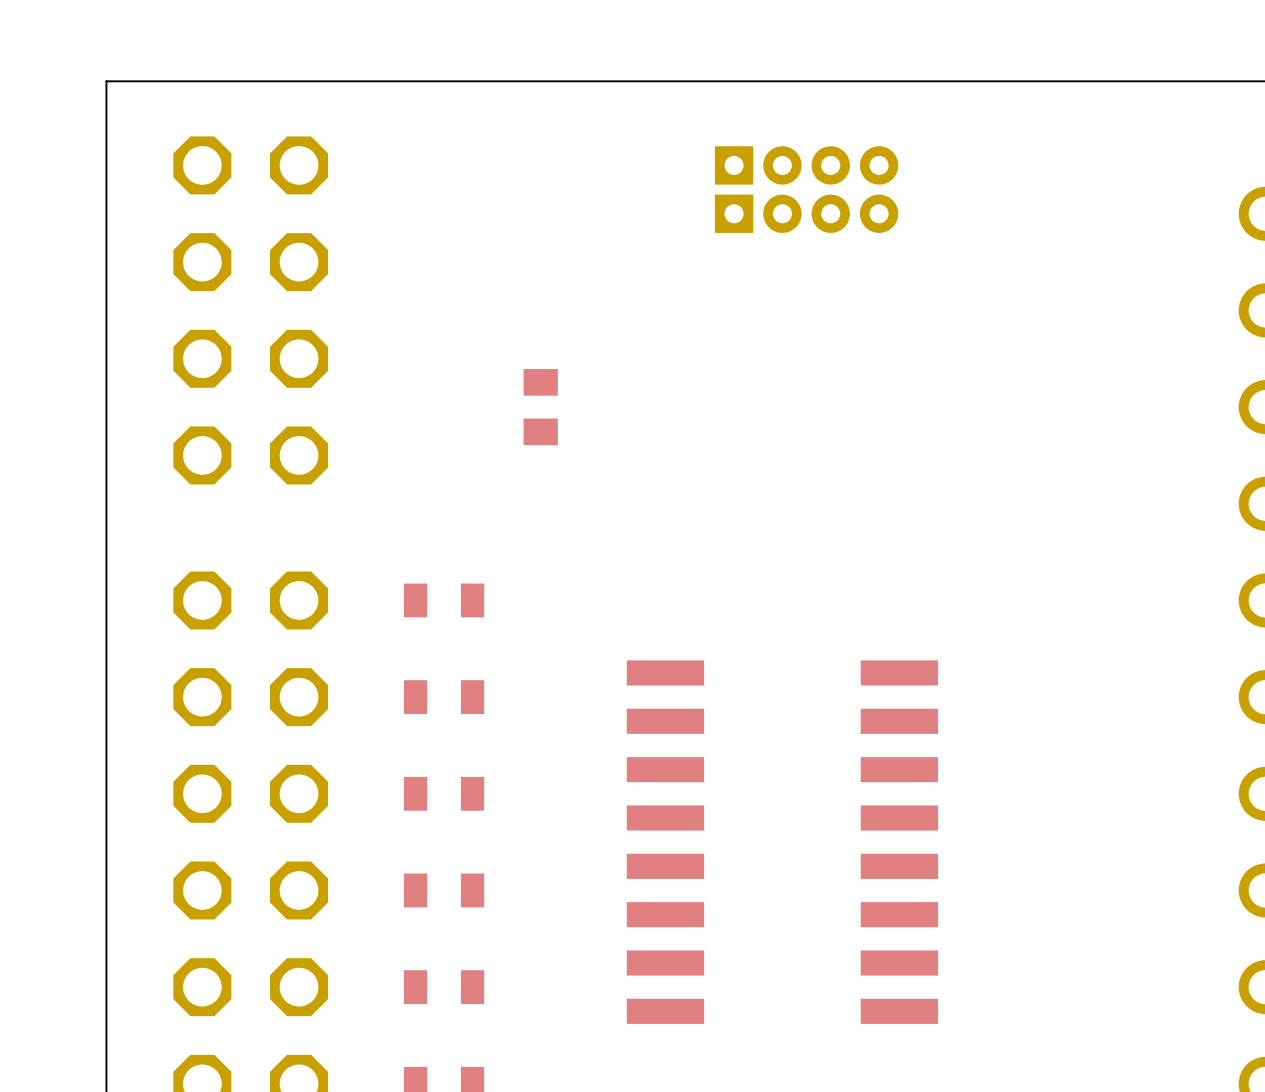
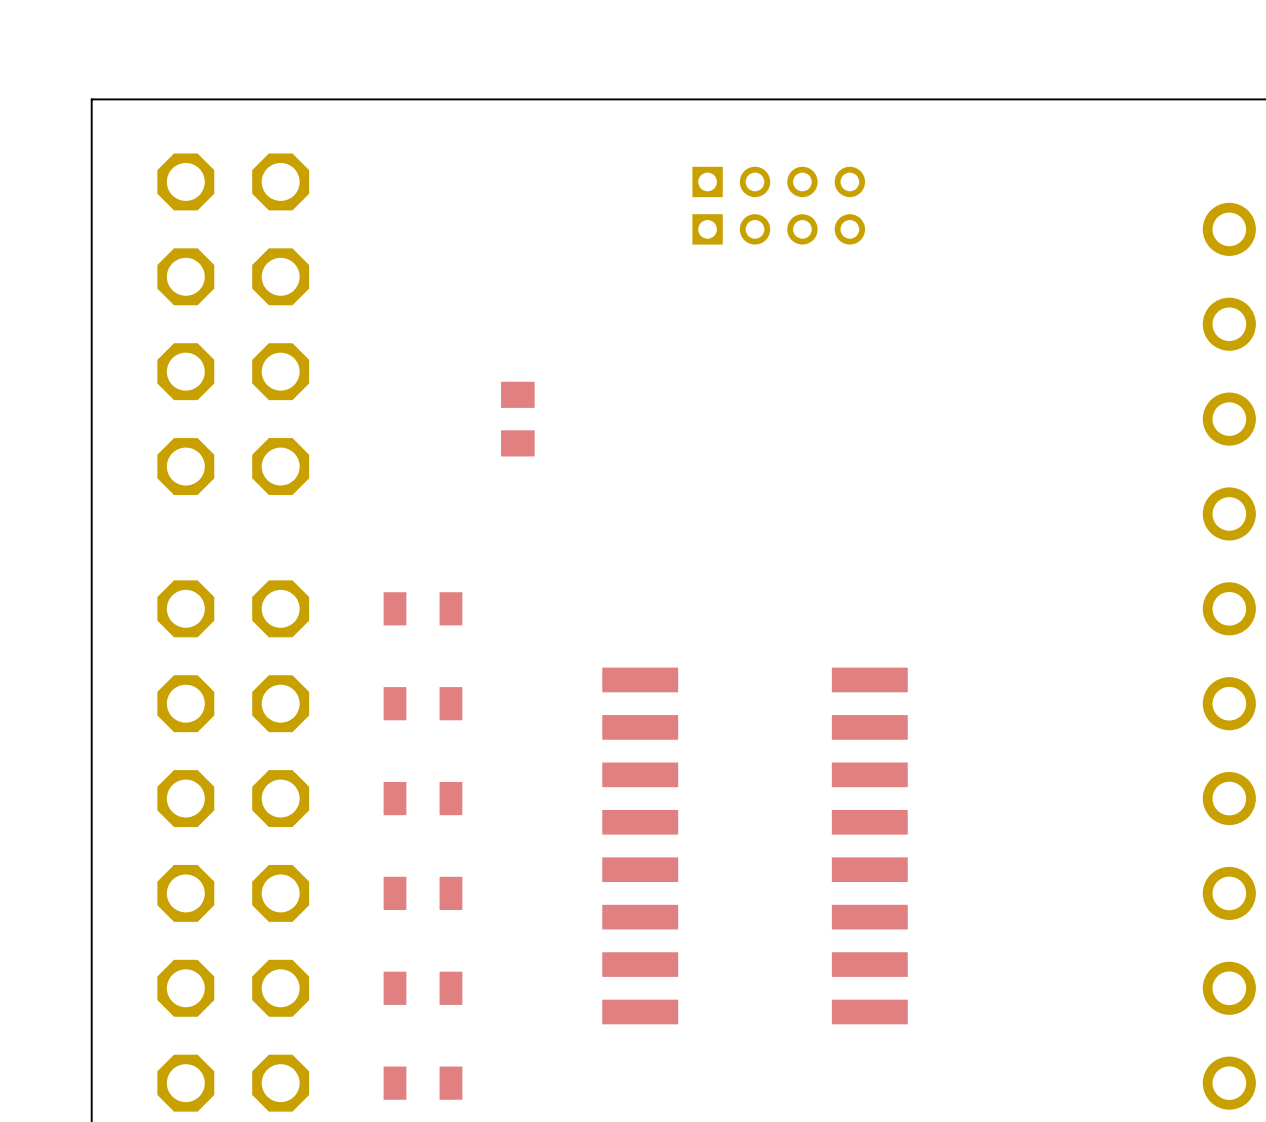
part footprint: [714, 146, 899, 233] -> [692, 166, 866, 245]

